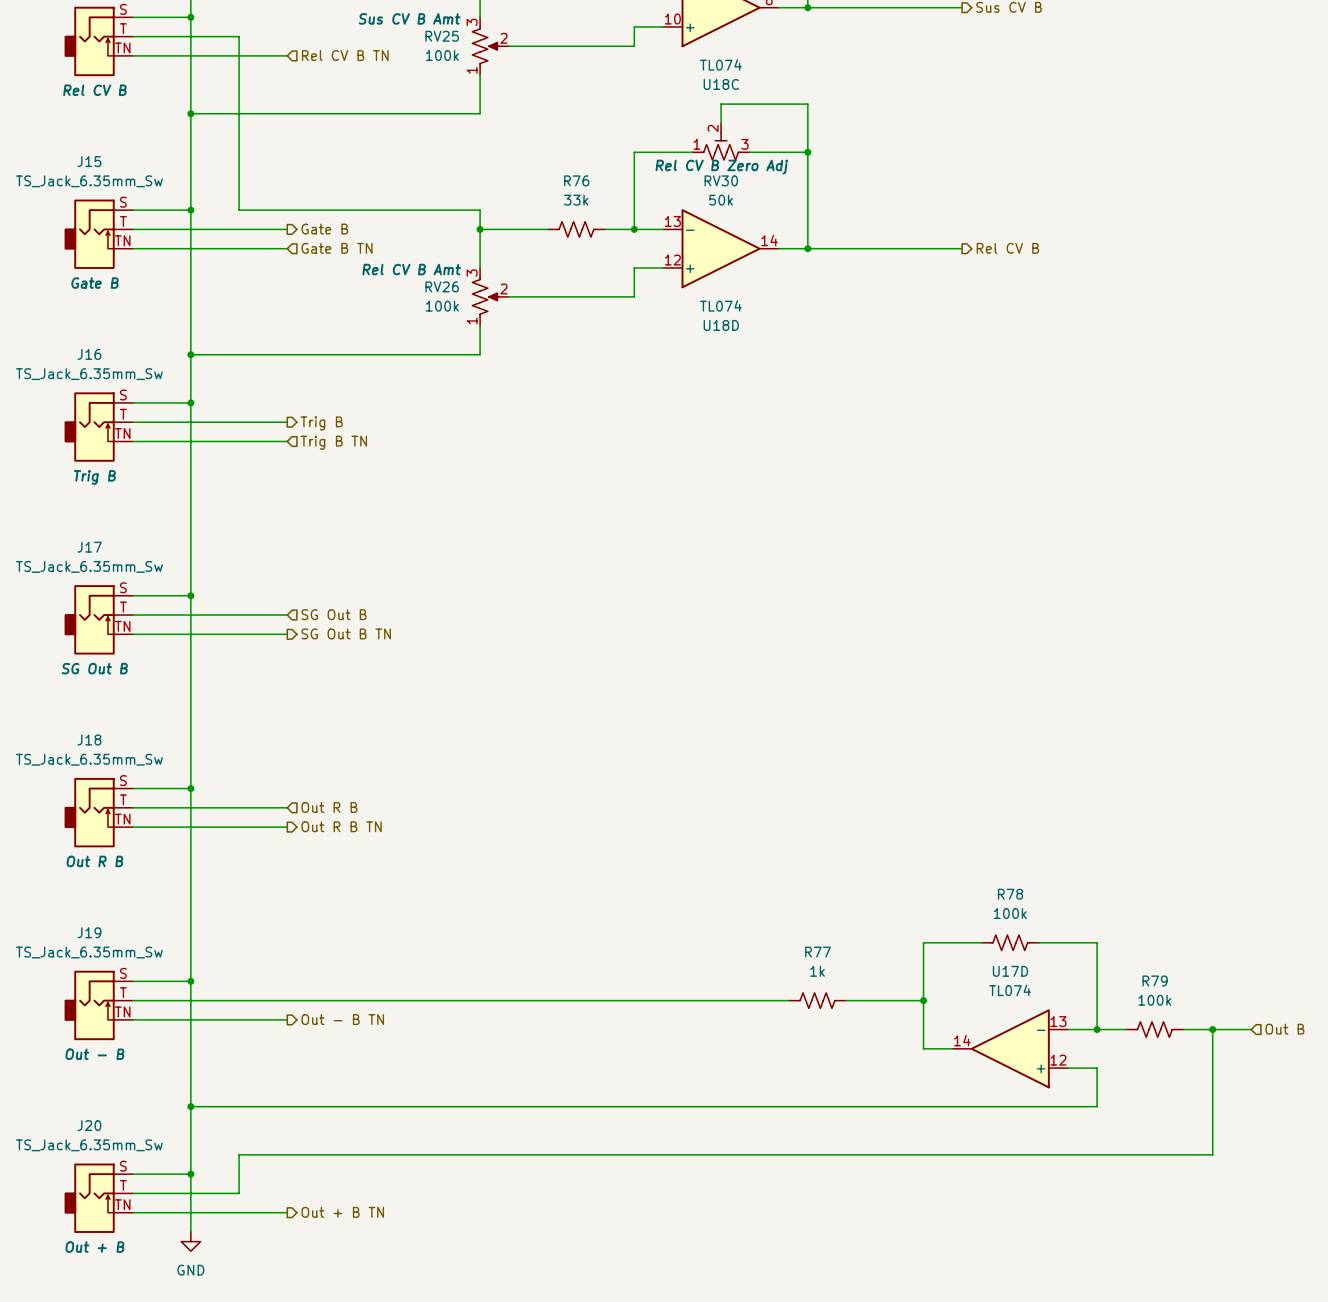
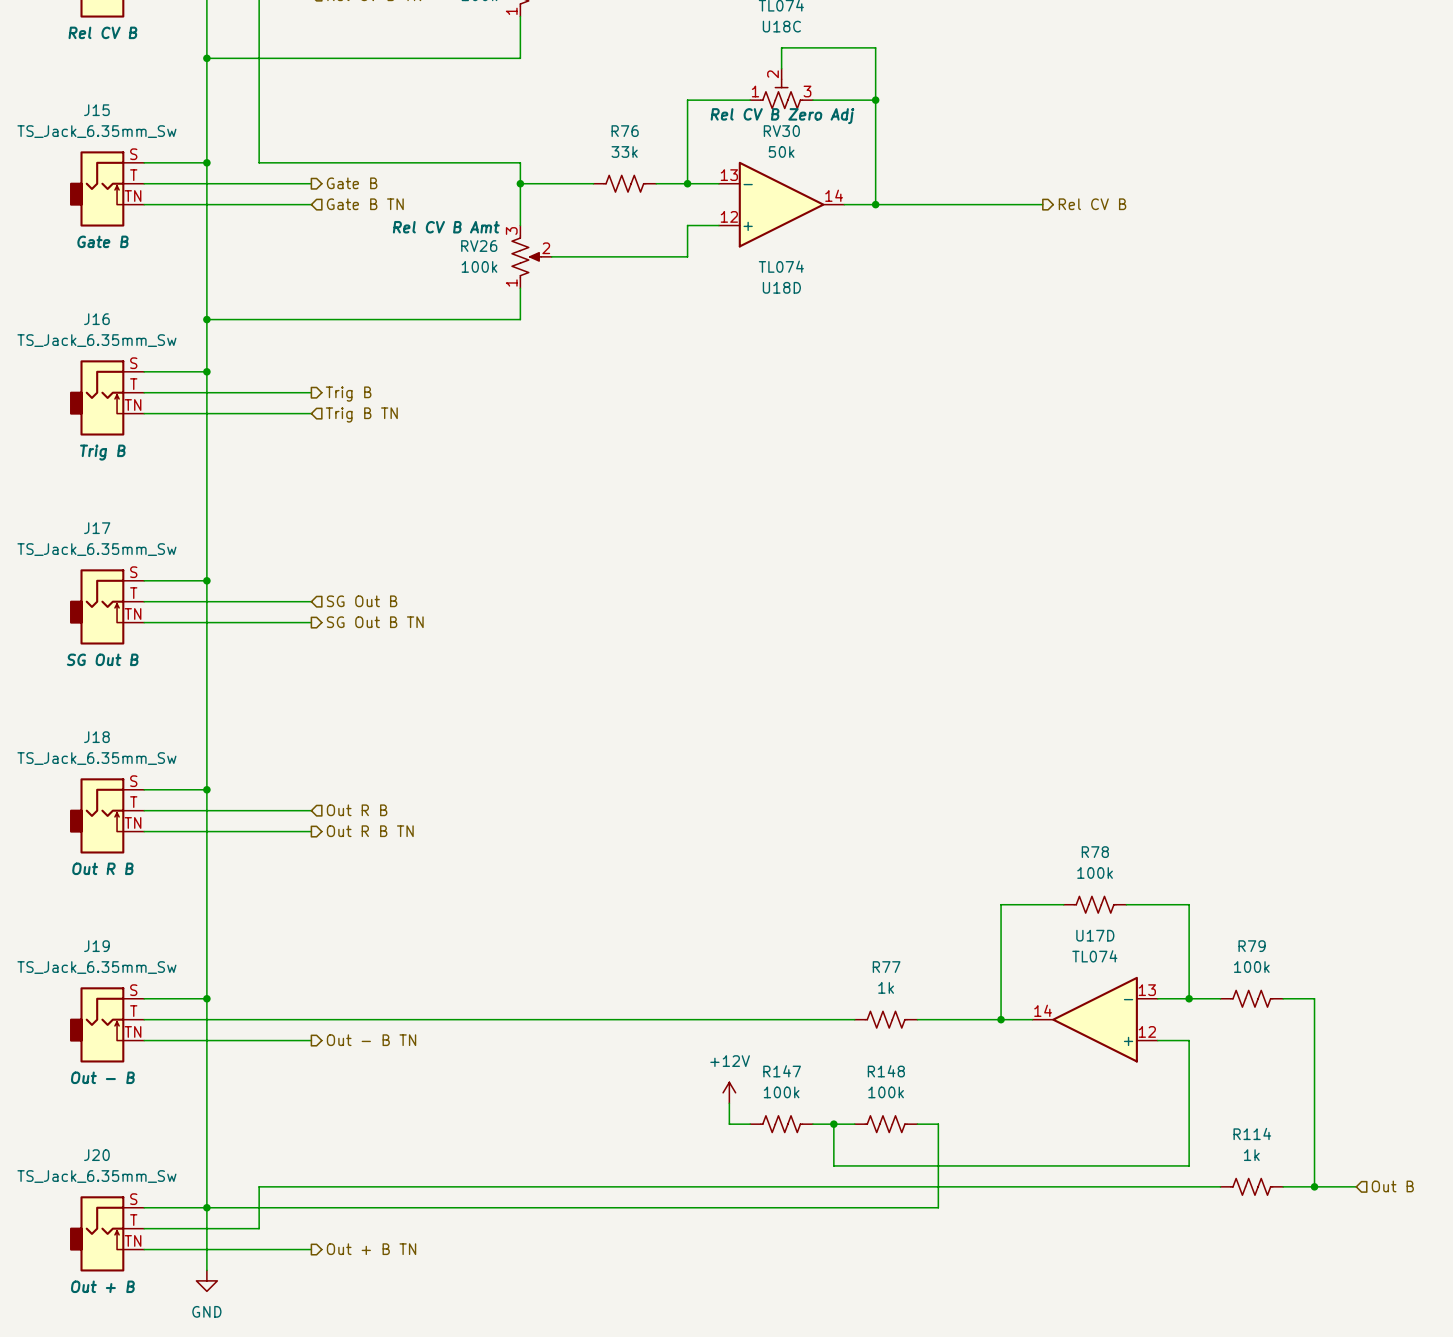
wire: (923, 942) (981, 942) -> (1001, 956) (1001, 904) (1063, 904)
R78 position: (1010, 942) -> (1095, 904)
wire: (1039, 942) (1097, 942) -> (1126, 904) (1189, 904) (1189, 956)
wire: (1097, 981) (1097, 1019) -> (1157, 1040) (1189, 1040)
junction: none -> (1189, 998)
wire: none -> (1283, 998) (1314, 998) (1314, 1051)
wire: (923, 1000) (923, 1048) (952, 1048) -> (1001, 1019) (1032, 1019)
wire: (1068, 1029) (1125, 1029) -> (1157, 998) (1220, 998)
junction: (1097, 1029) -> none
R79 position: (1154, 1029) -> (1251, 998)
wire: (1183, 1029) (1251, 1029) -> none
junction: (1212, 1029) -> none
hierarchical label position: Out B (1284, 1029) -> Out B (1392, 1186)
U17D position: (1010, 1048) -> (1095, 1019)
power symbol: none -> +12V (729, 1092)
wire: (1068, 1068) (1097, 1068) -> (1189, 1051) (1189, 1092)
wire: none -> (729, 1103) (729, 1124) (750, 1124)
R147: none -> 100k (781, 1124)
wire: none -> (812, 1124) (854, 1124)
junction: none -> (833, 1124)
R148: none -> 100k (886, 1124)
wire: none -> (917, 1124) (938, 1124) (938, 1207) (206, 1207)
wire: (190, 1106) (1097, 1106) -> (833, 1124) (833, 1165) (1189, 1165) (1189, 1134)
junction: (190, 1106) -> none
R114: none -> 1k (1251, 1186)
wire: none -> (1314, 1186) (1356, 1186)
junction: none -> (1314, 1186)

